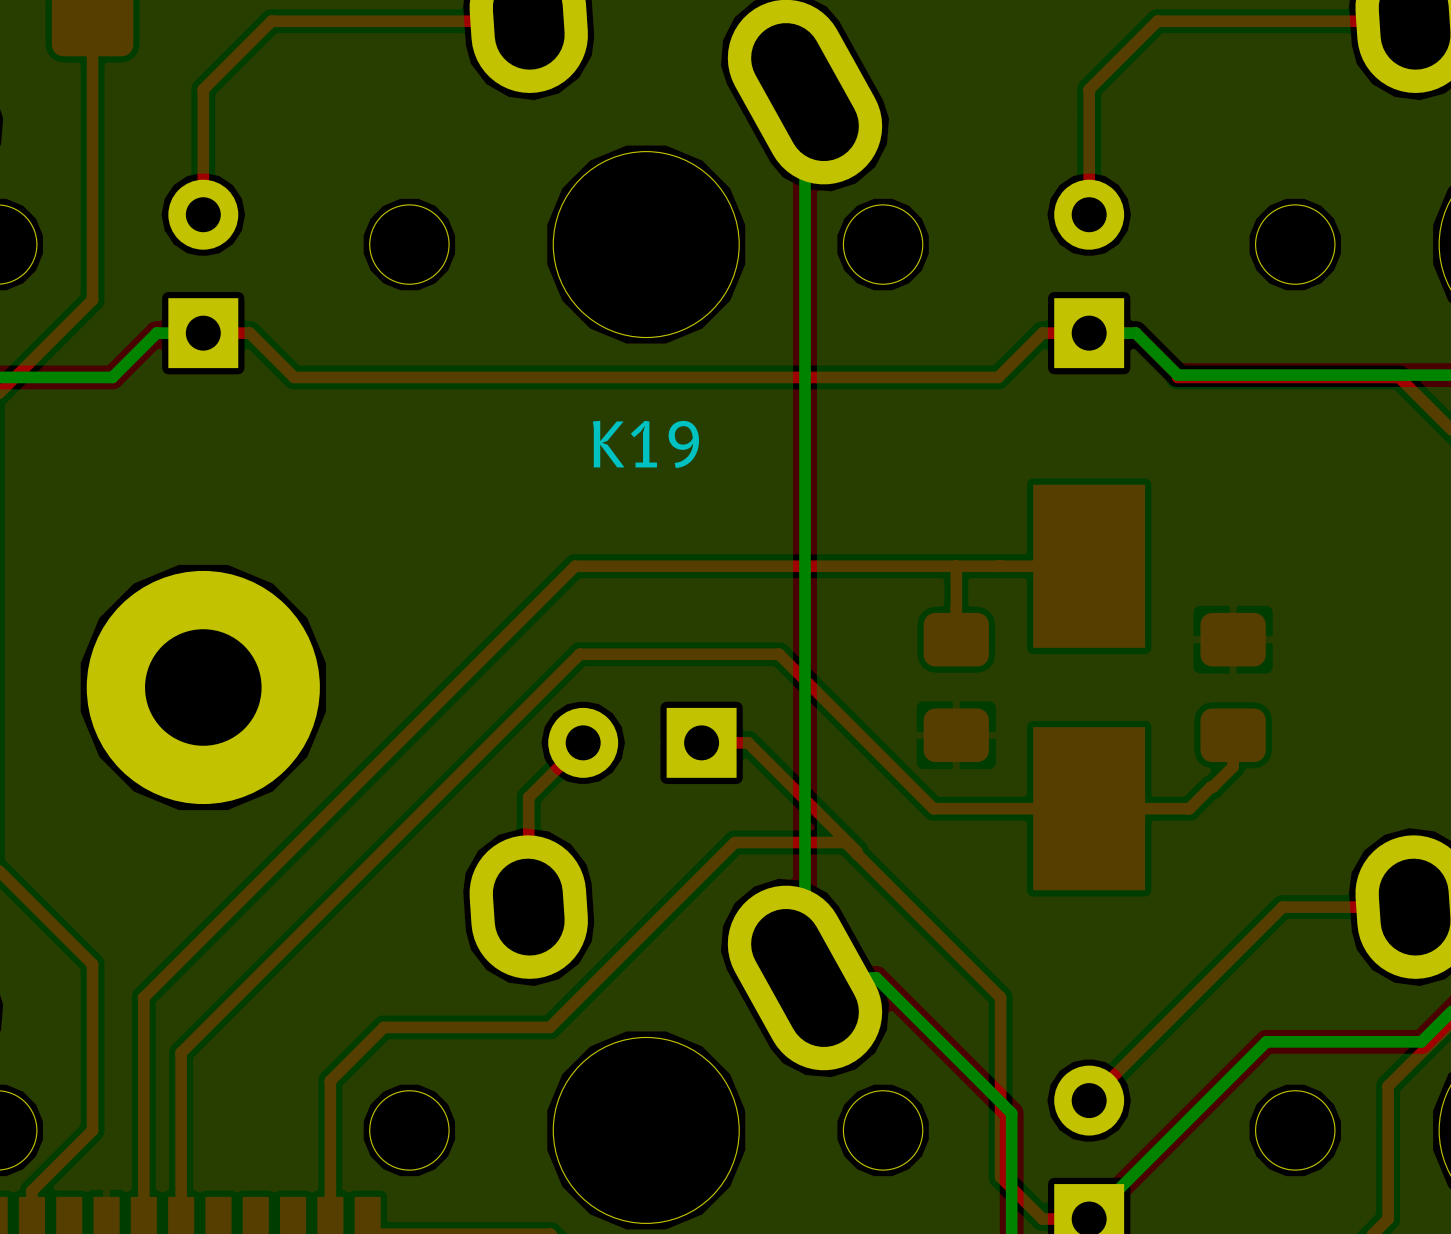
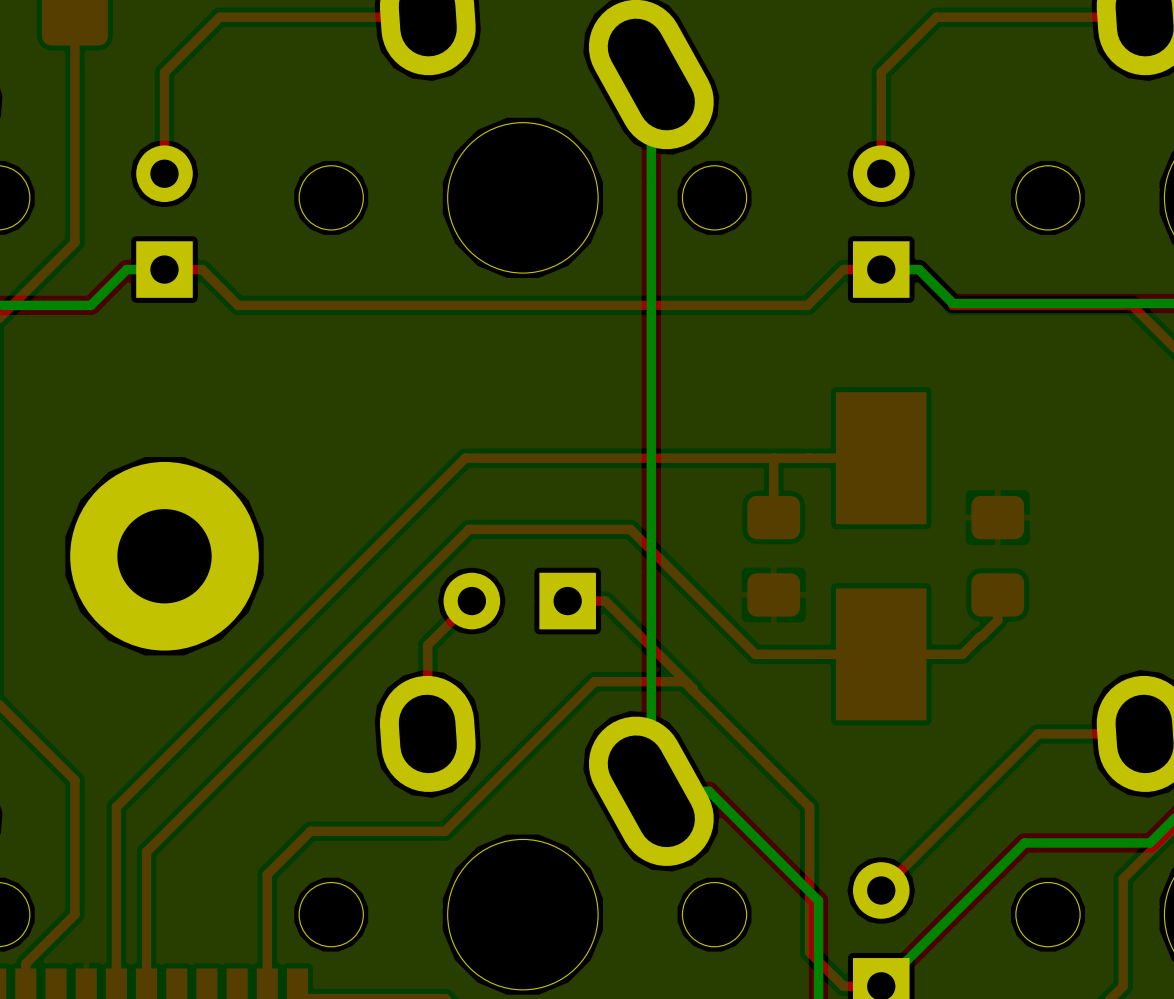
K19 name: K19 (645, 444) -> none

